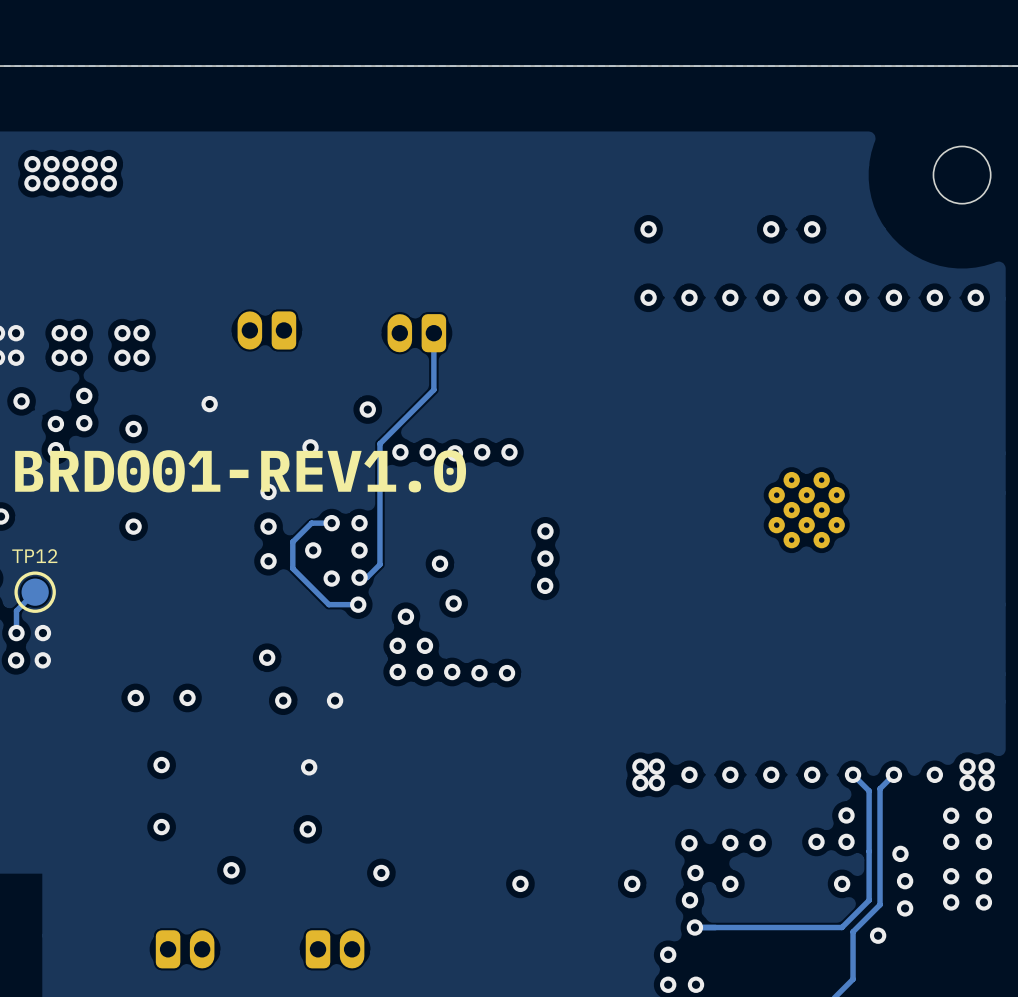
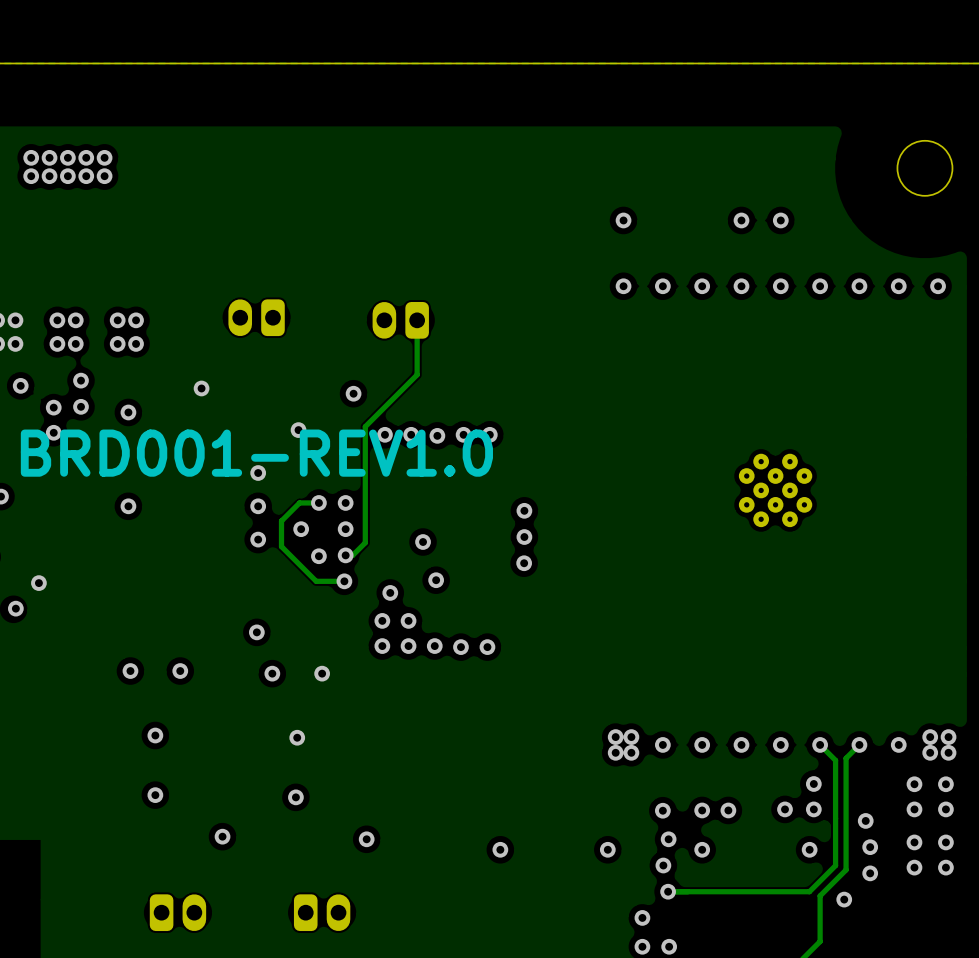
track: (35, 592) (16, 610) (16, 633) -> none
TP12: (35, 592) -> none
via: none -> (38, 583)
via: (42, 633) -> none
via: (16, 660) -> none
via: (42, 660) -> none

